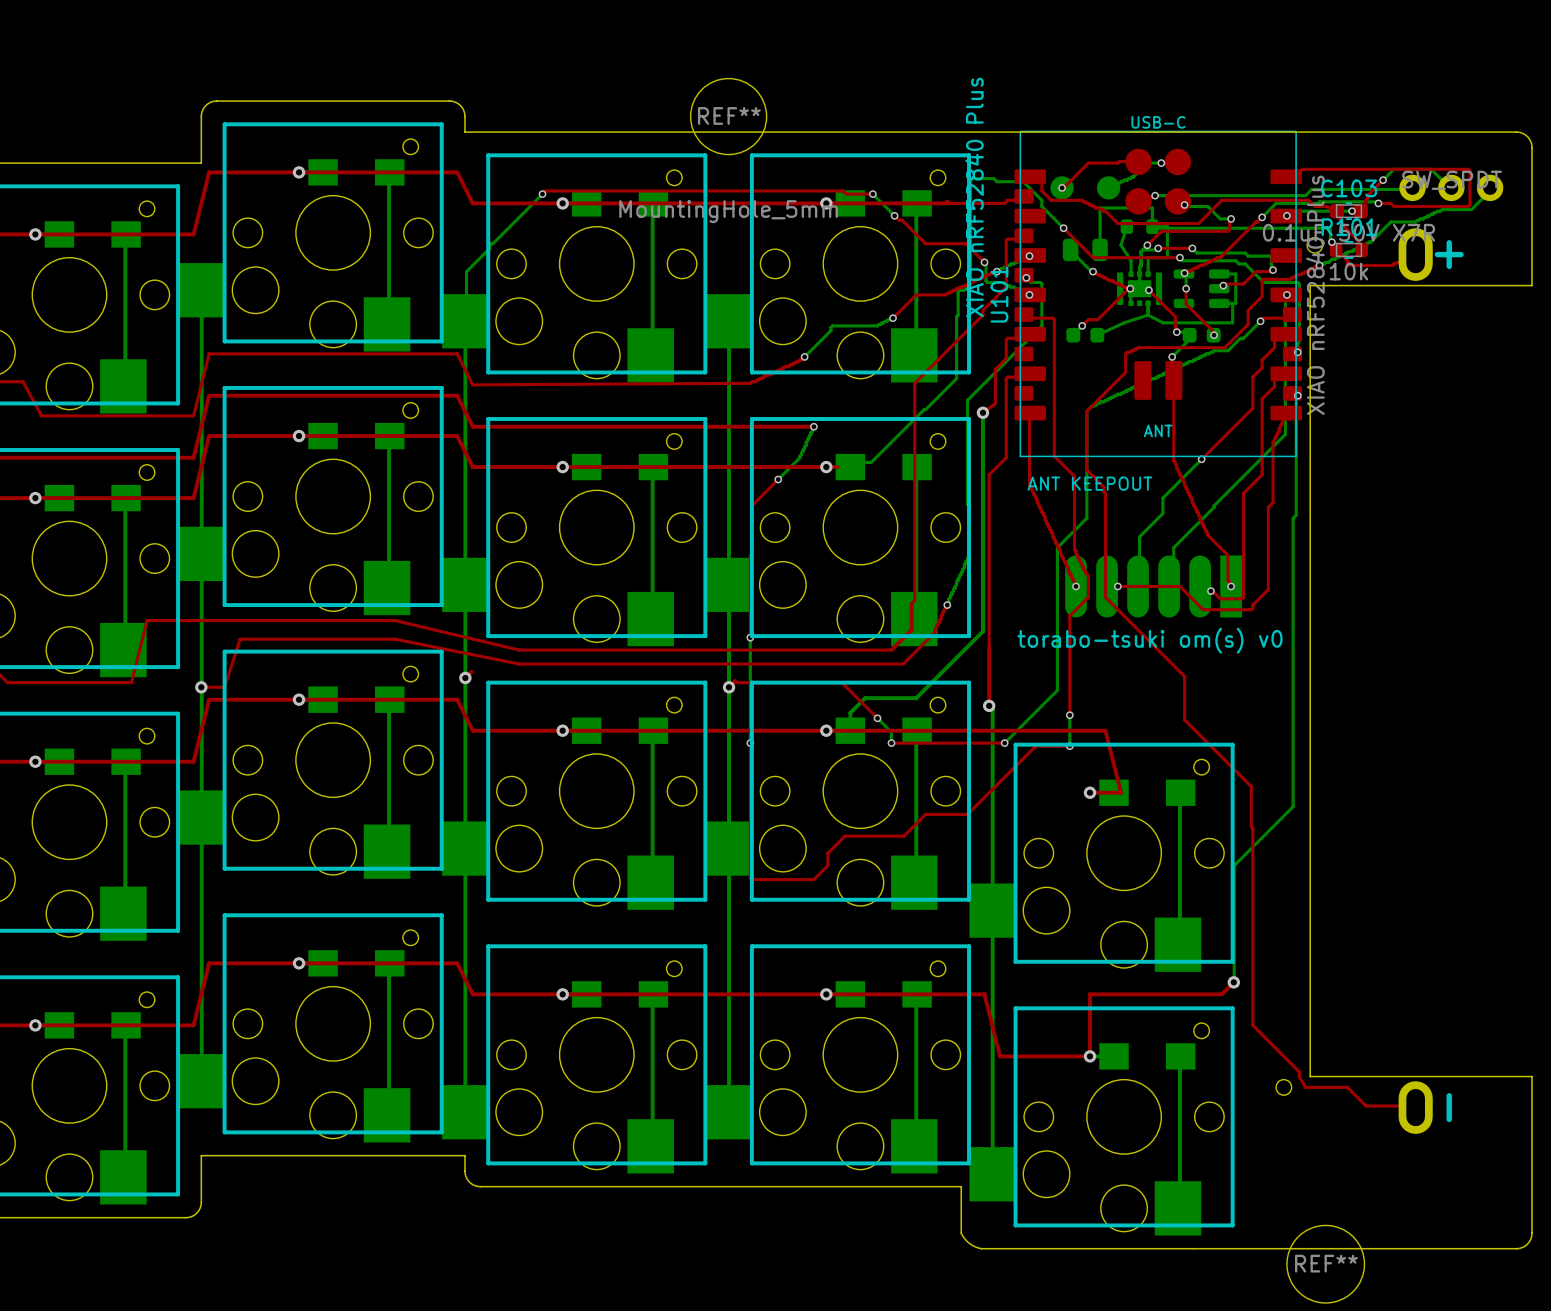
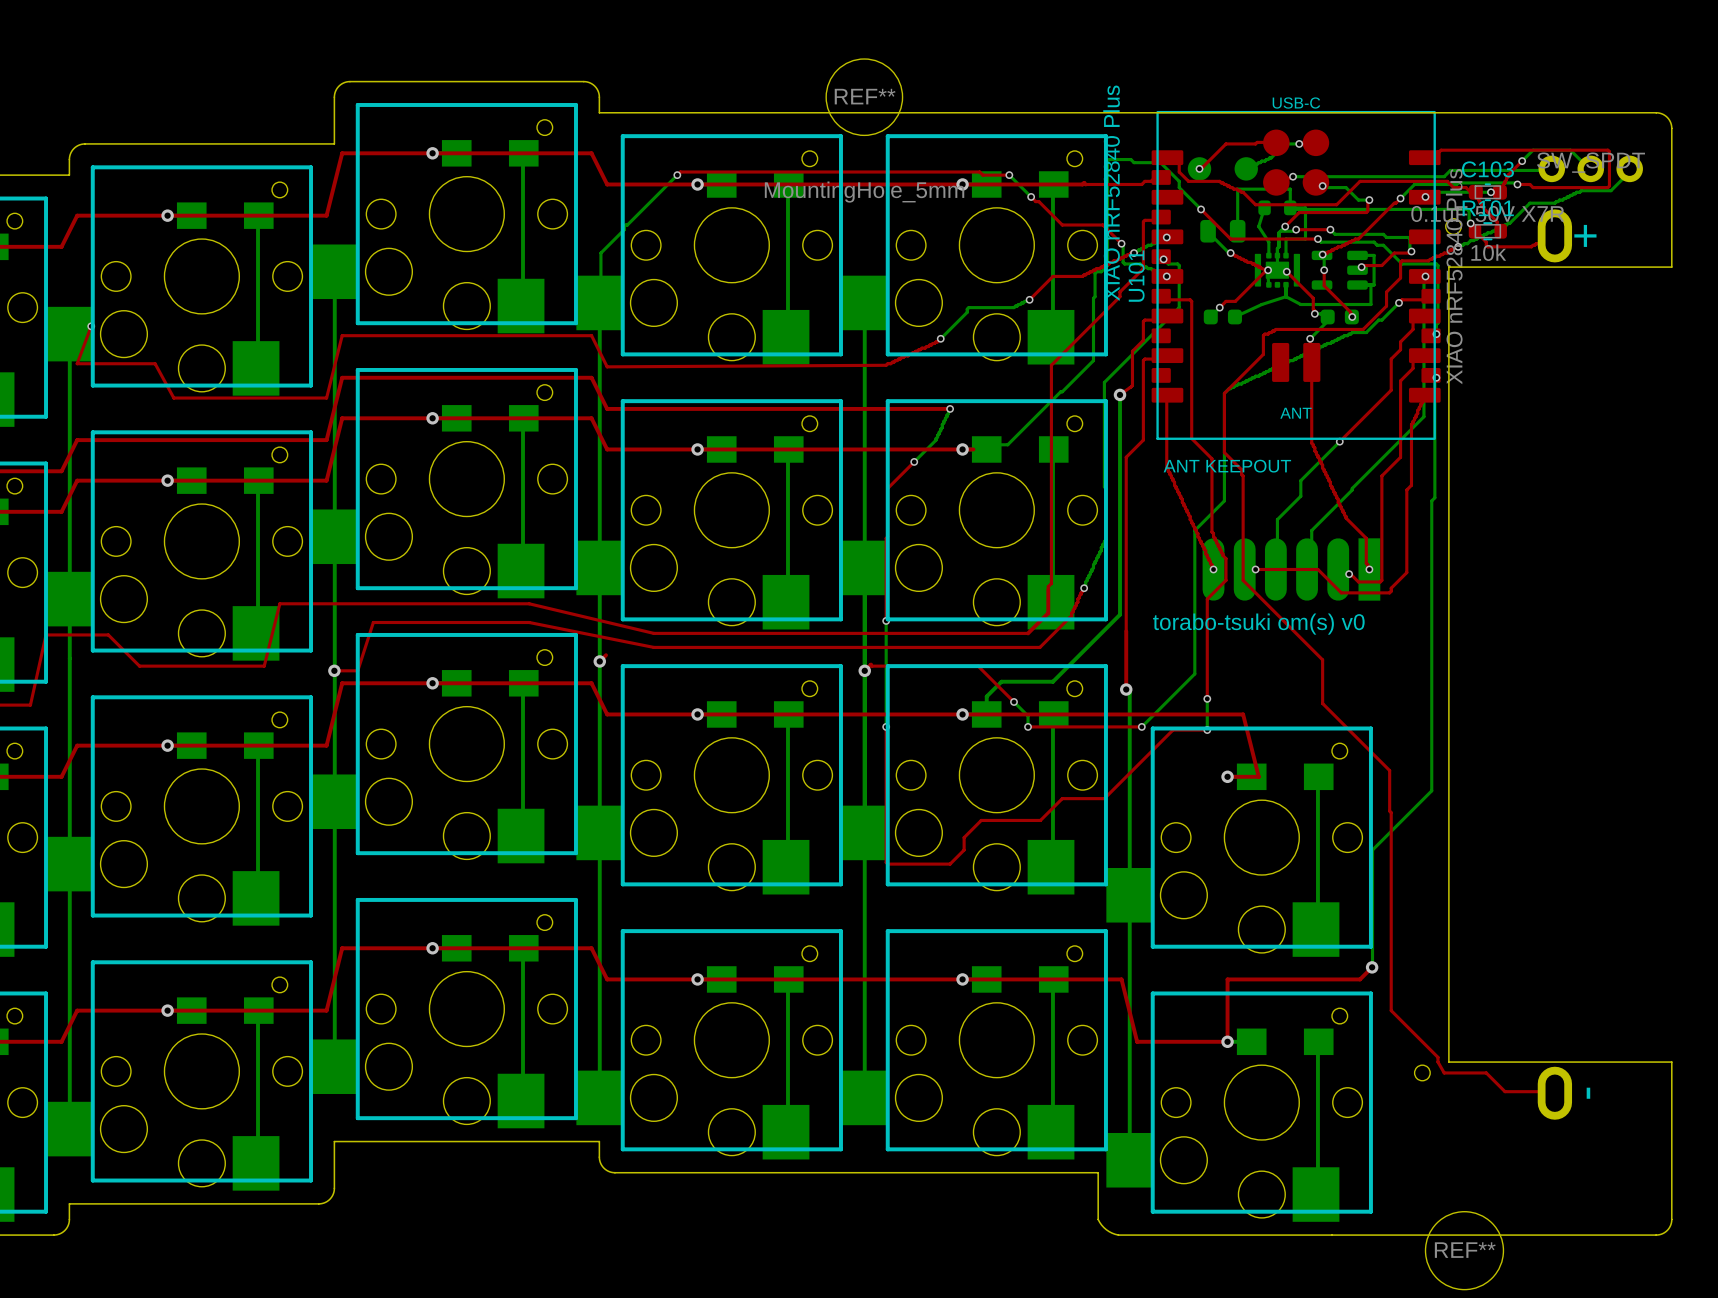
U101 footprint: [1014, 130, 1303, 458] -> [1151, 110, 1441, 440]

